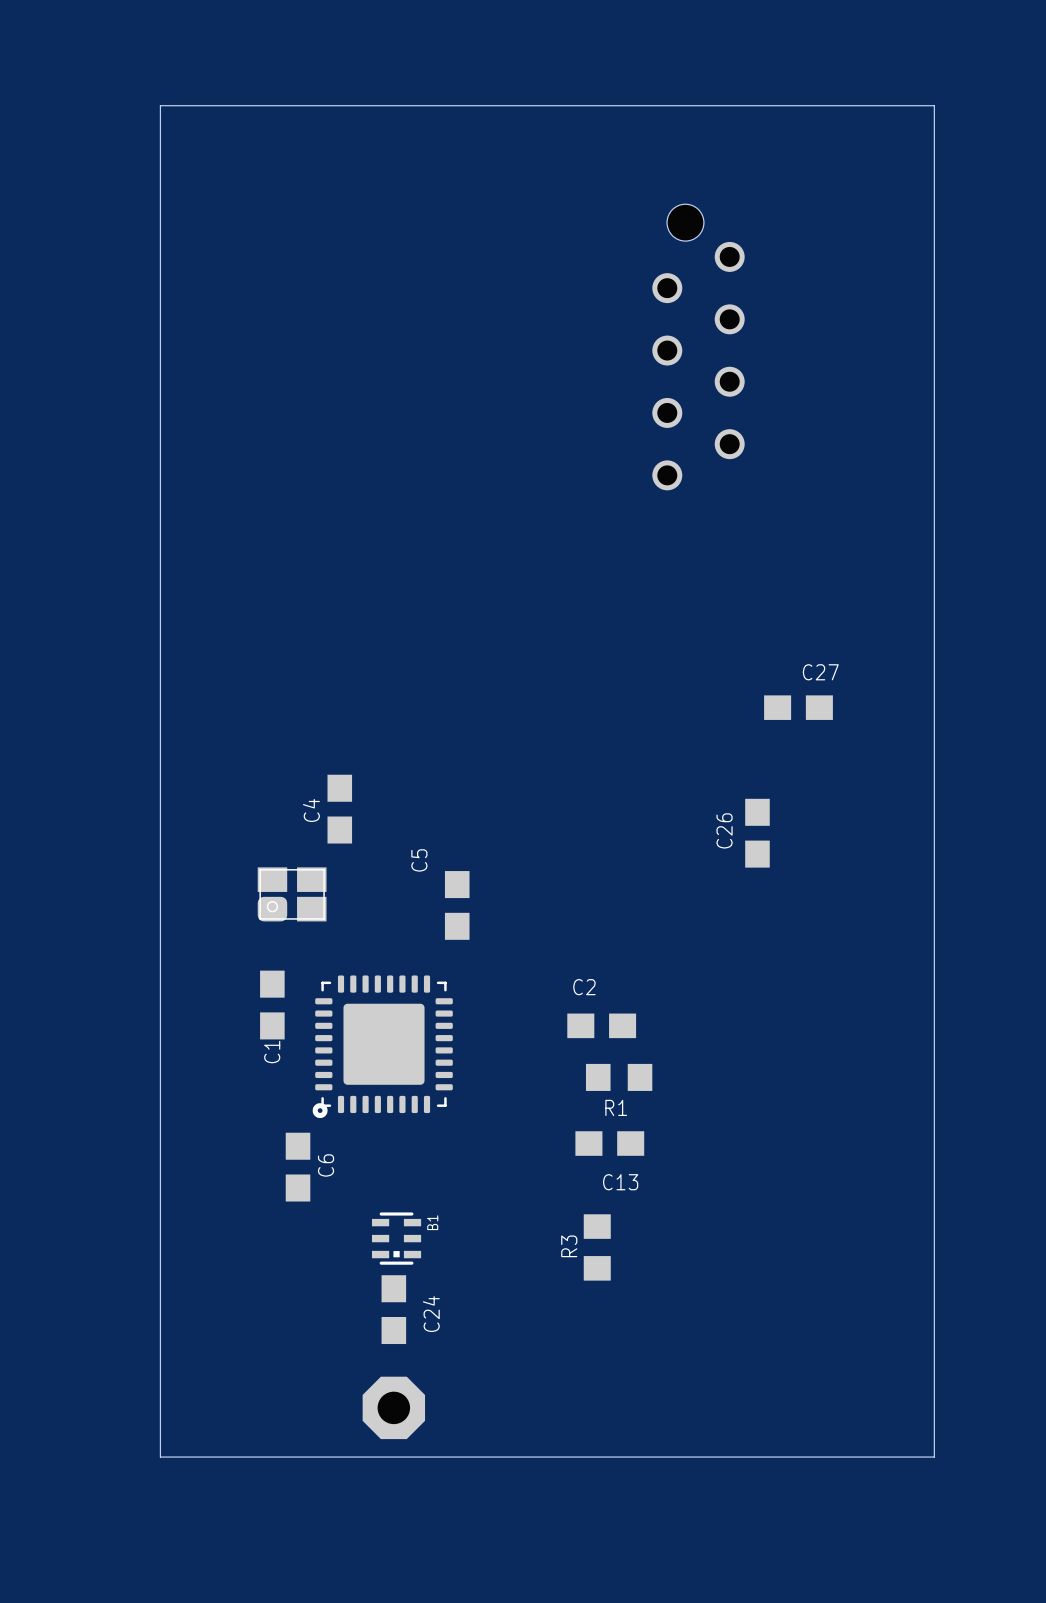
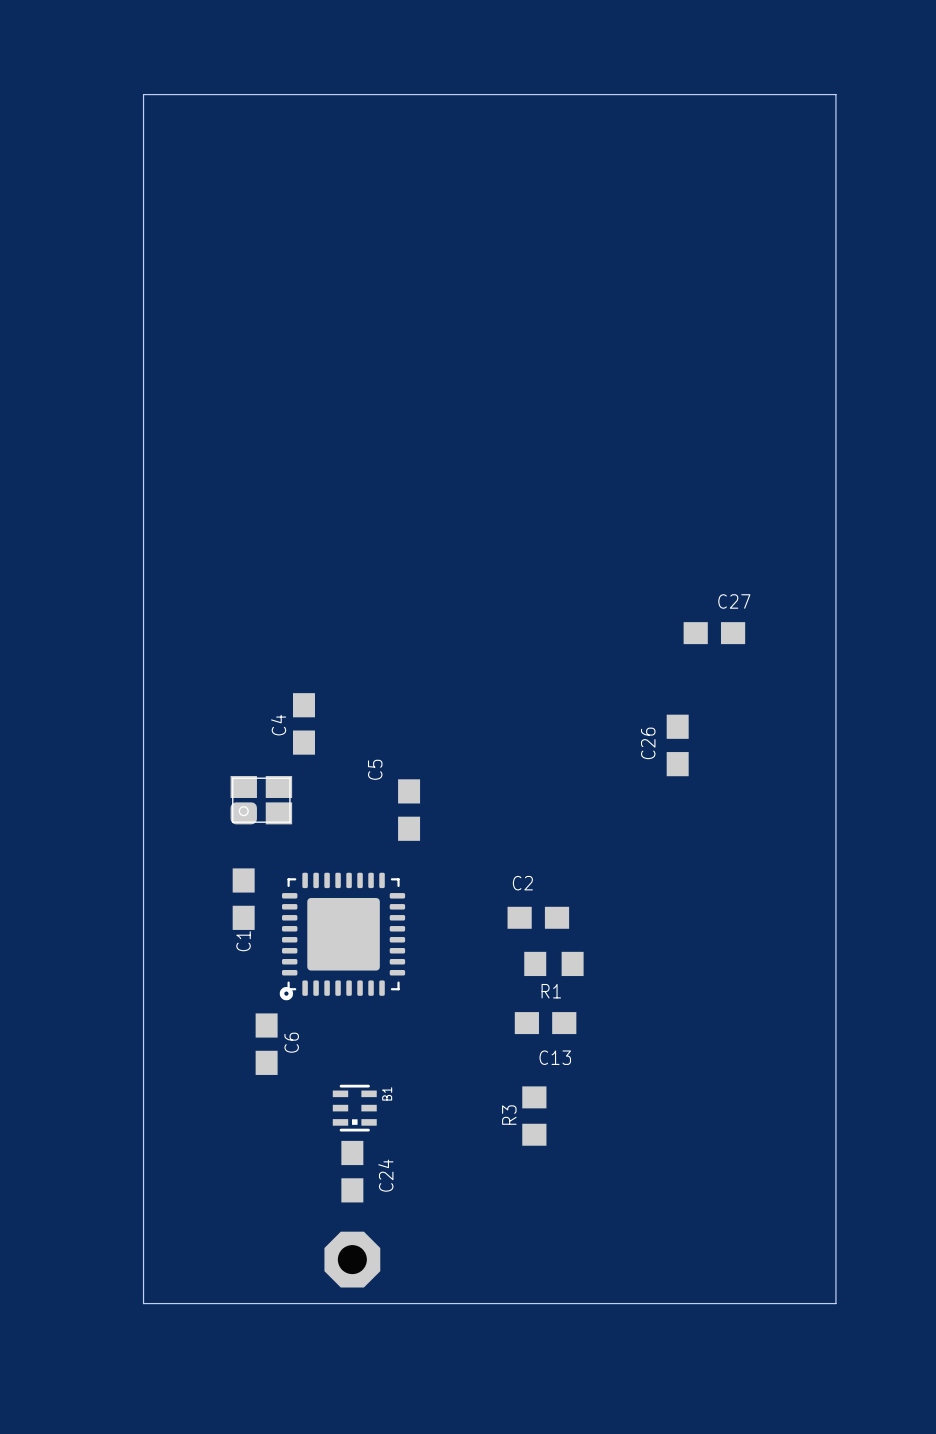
hole: (685, 222) -> none
part: (698, 366) -> none

